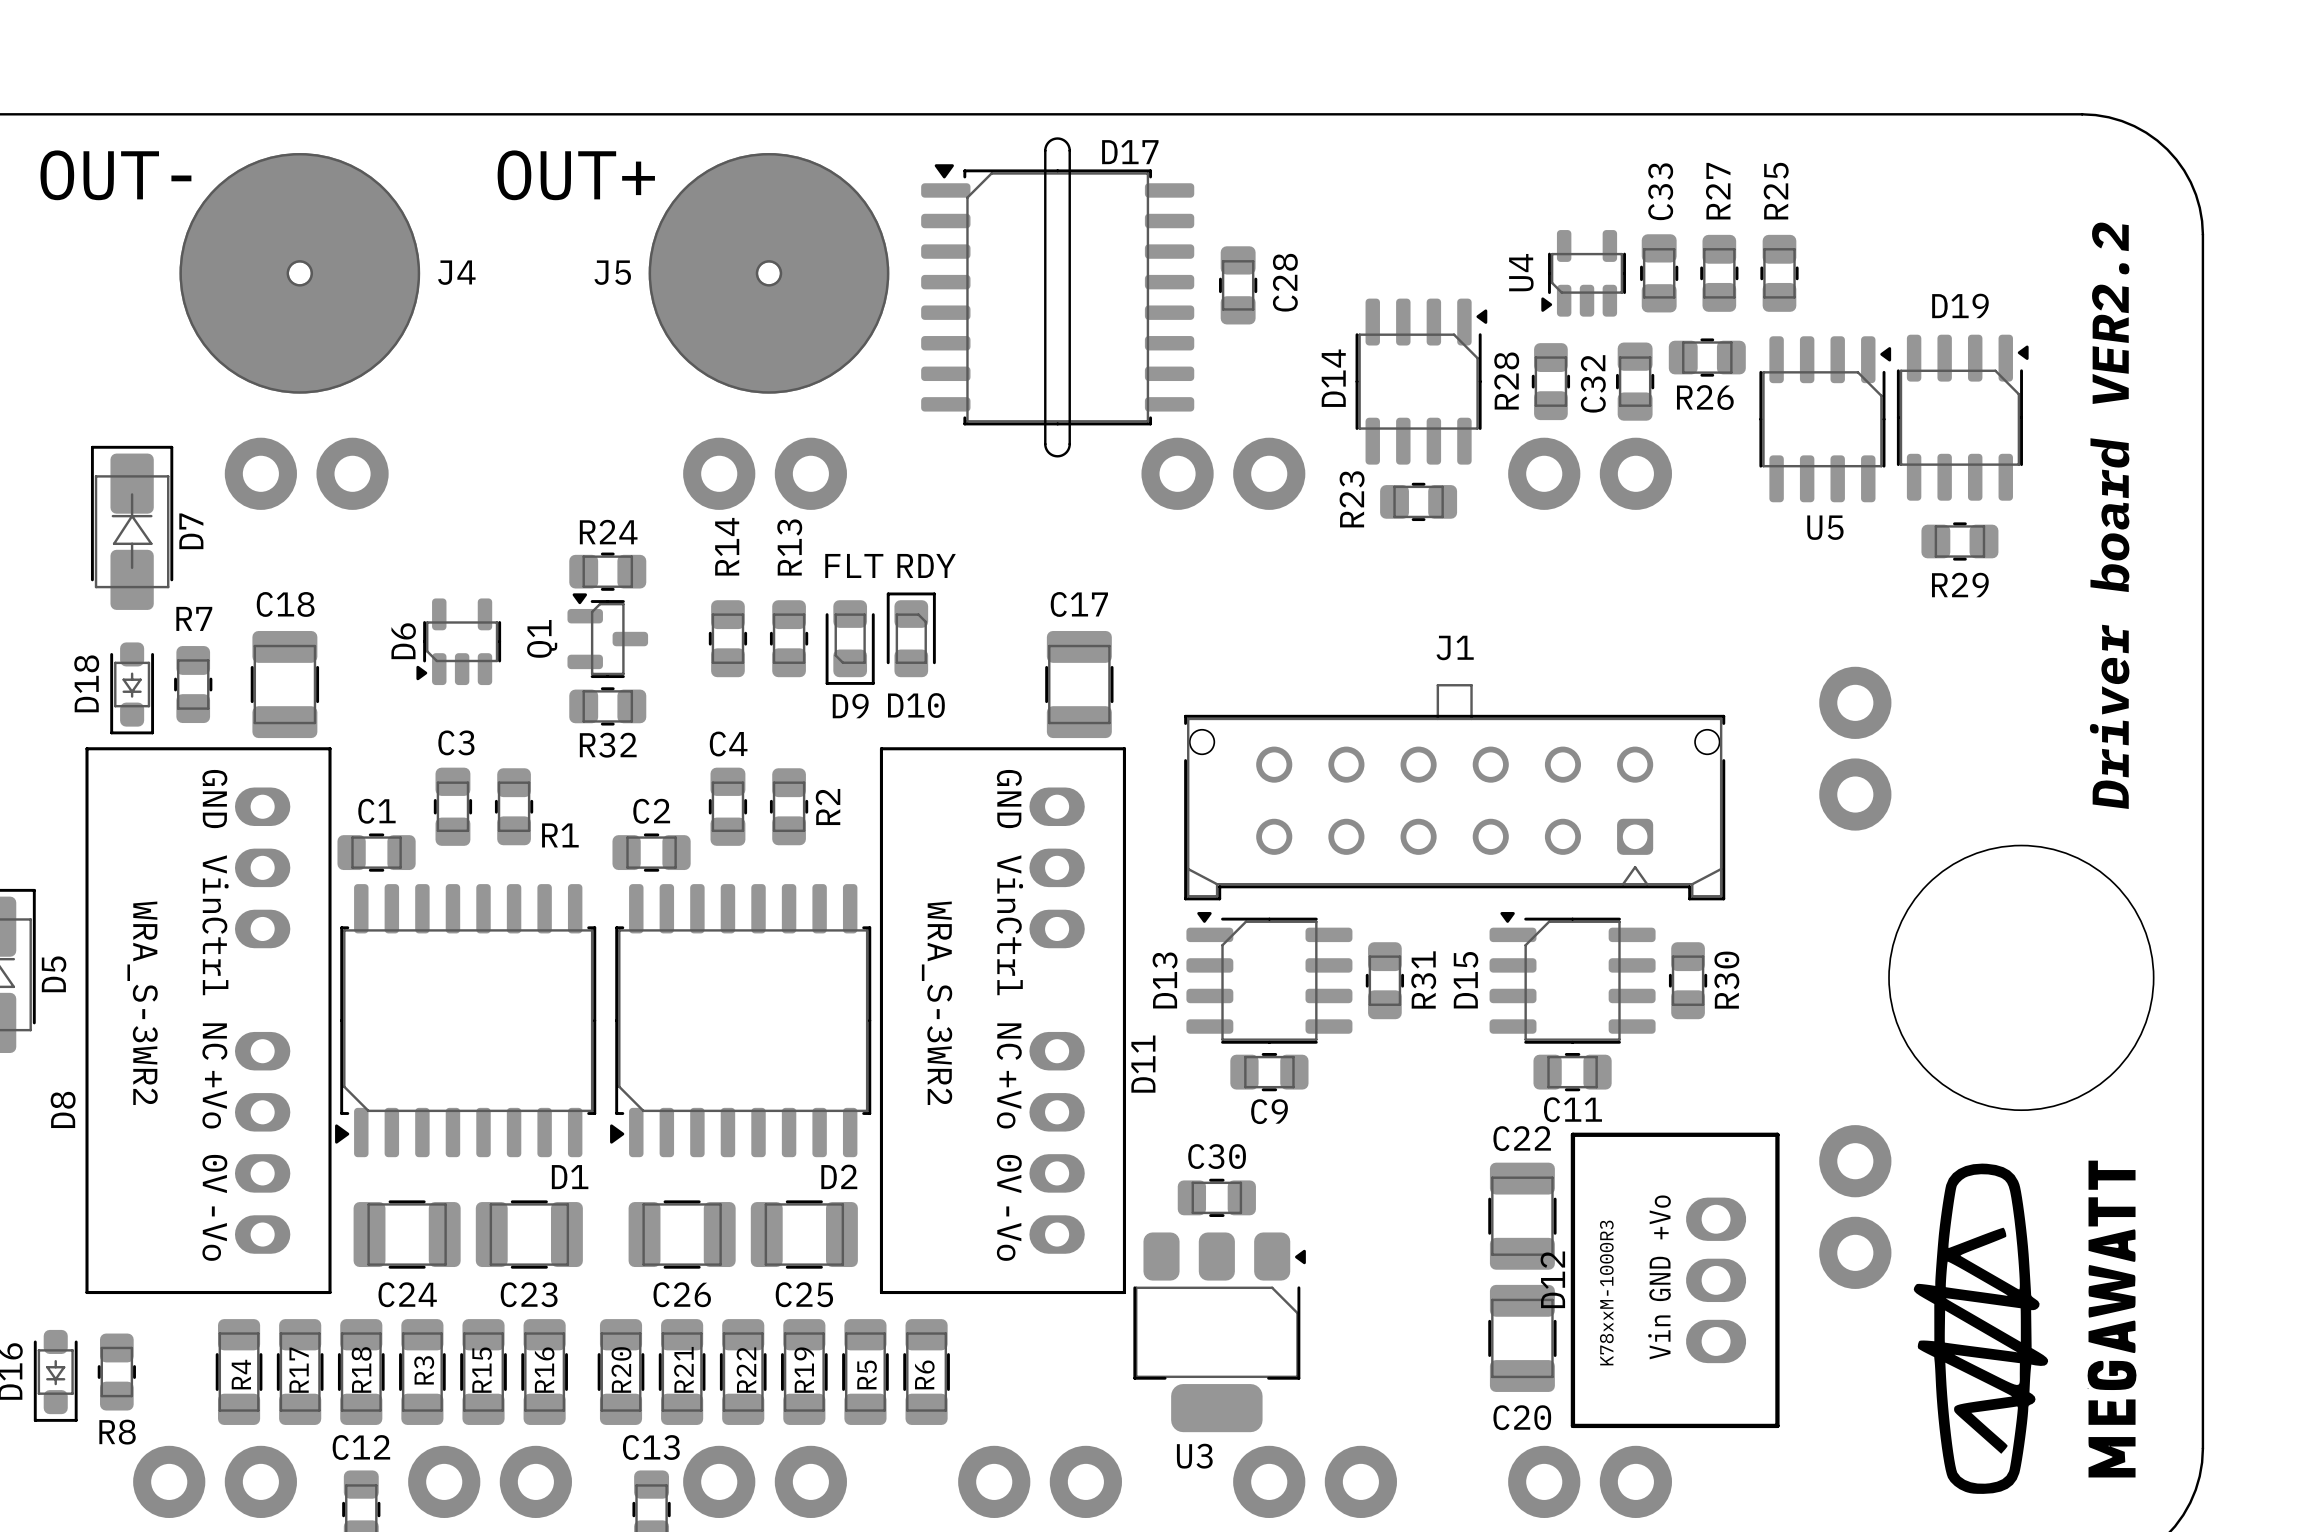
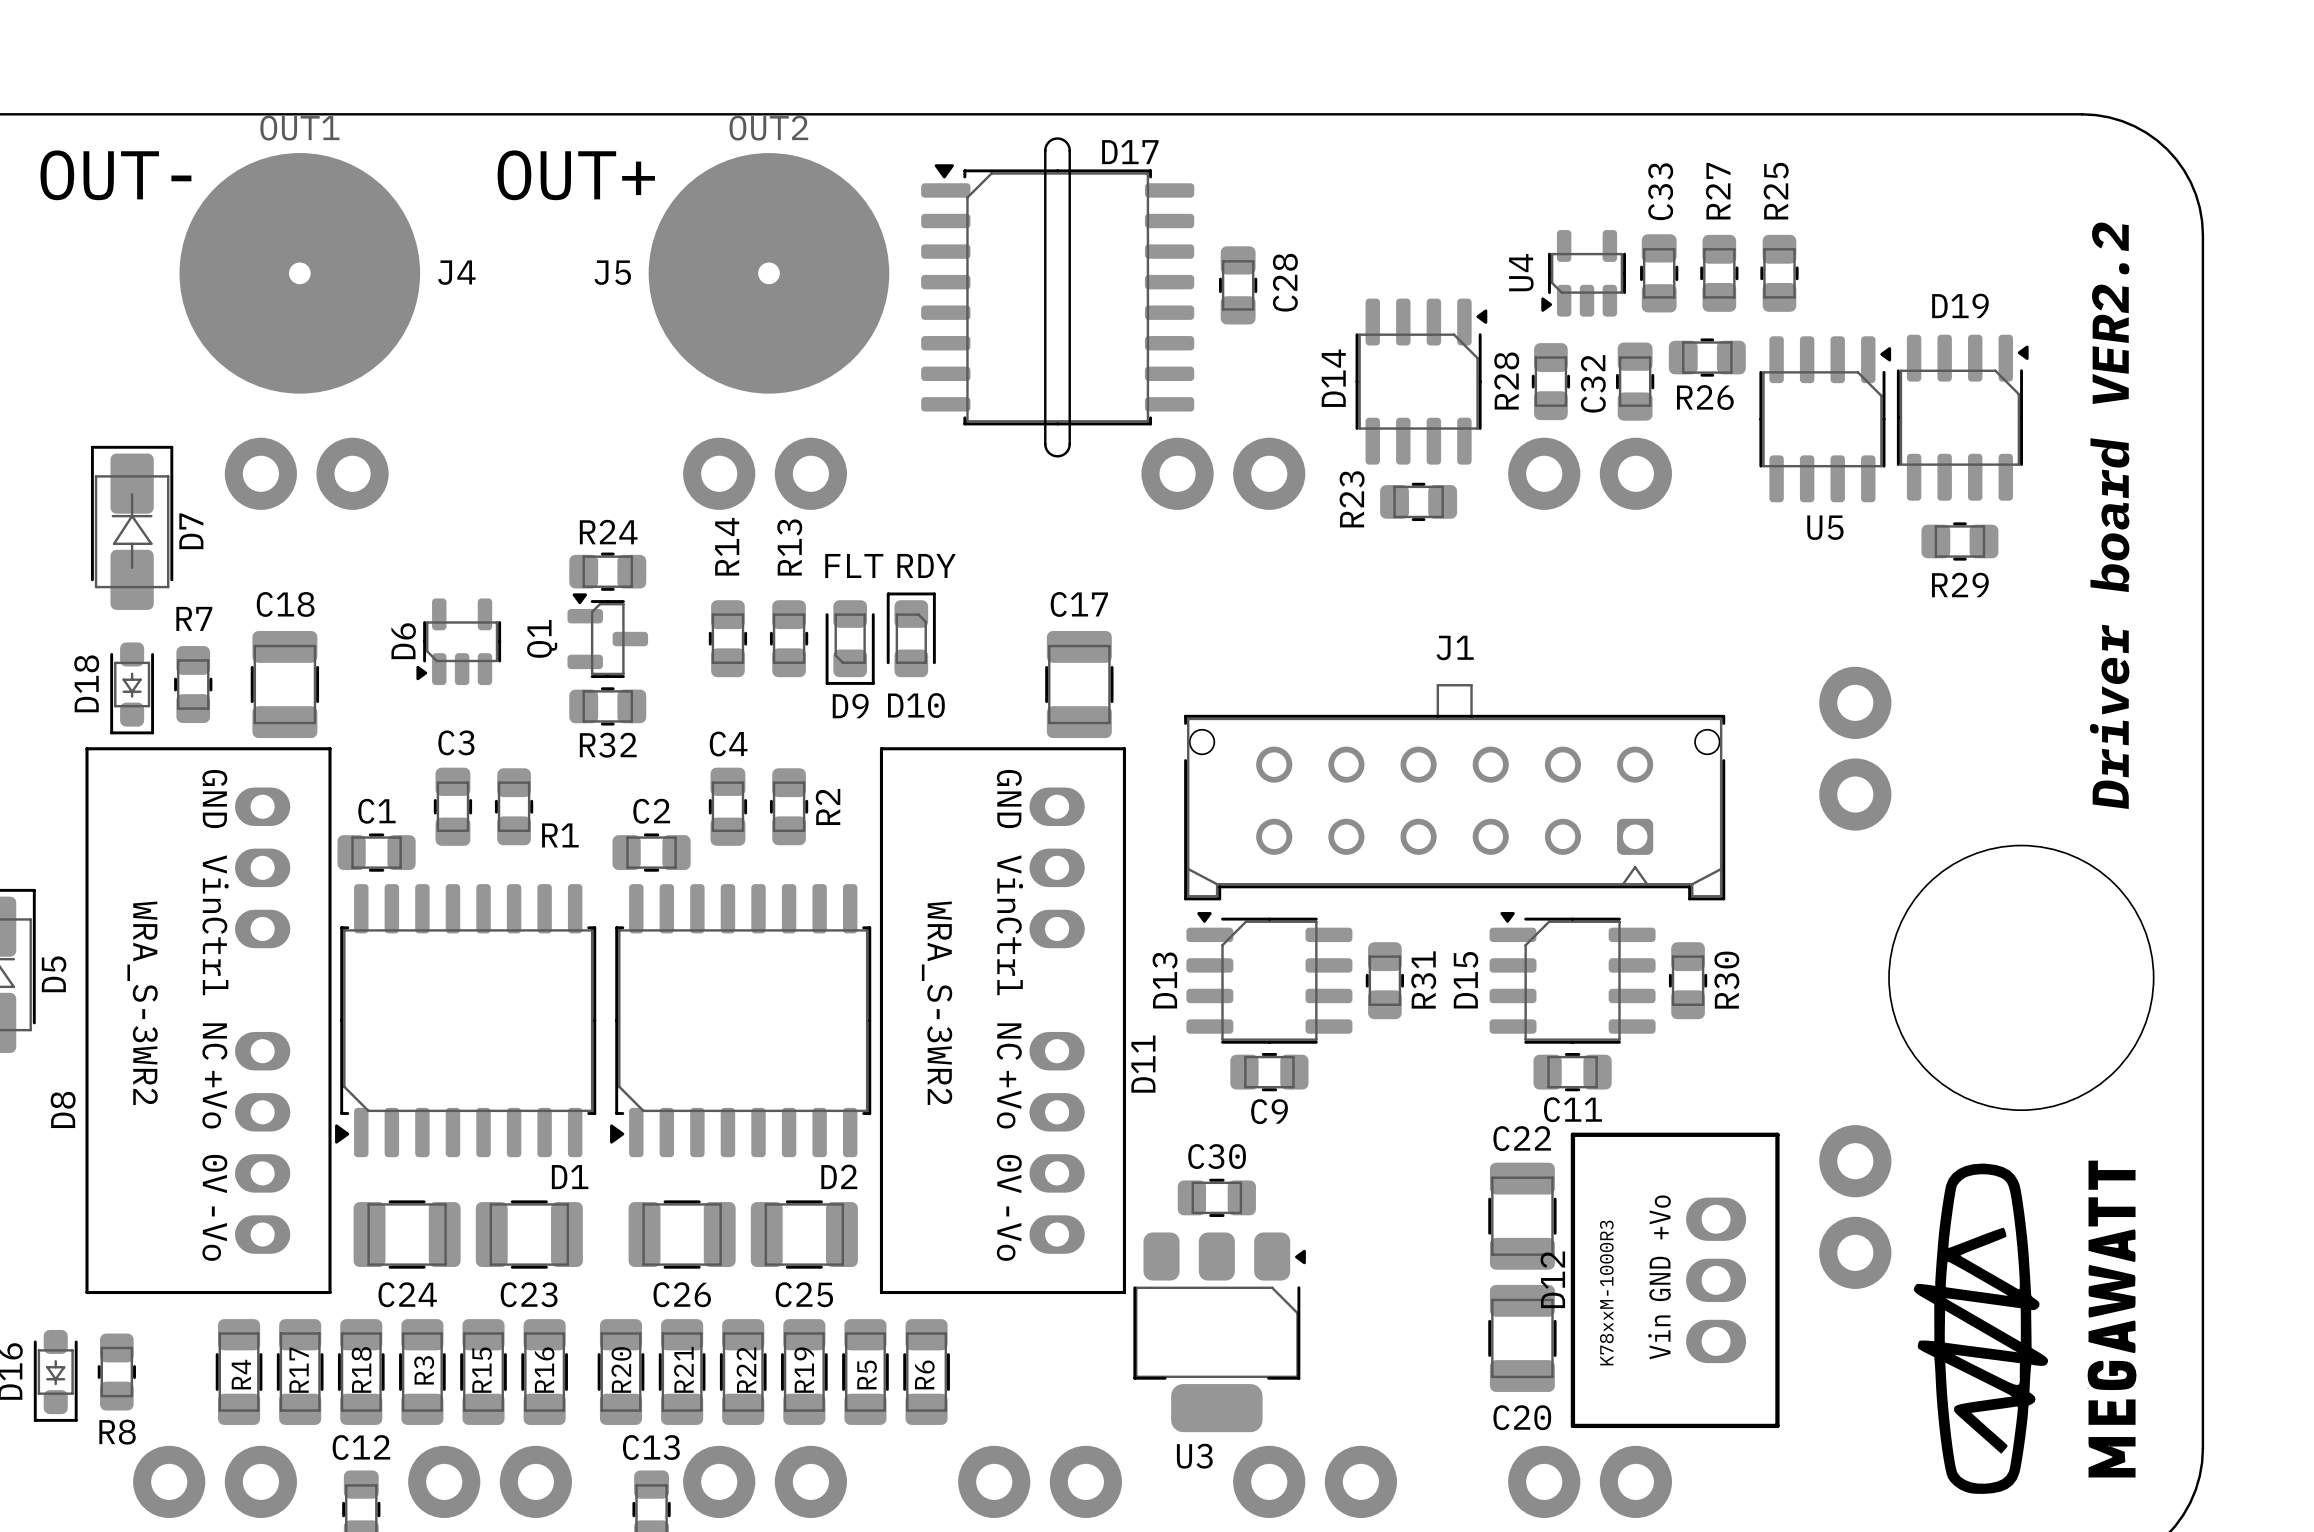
J4 value: none -> OUT1 (299, 128)
J5 value: none -> OUT2 (768, 128)
J4 footprint: [179, 153, 421, 394] -> [179, 153, 421, 394]
J5 footprint: [648, 153, 890, 394] -> [648, 153, 890, 394]

